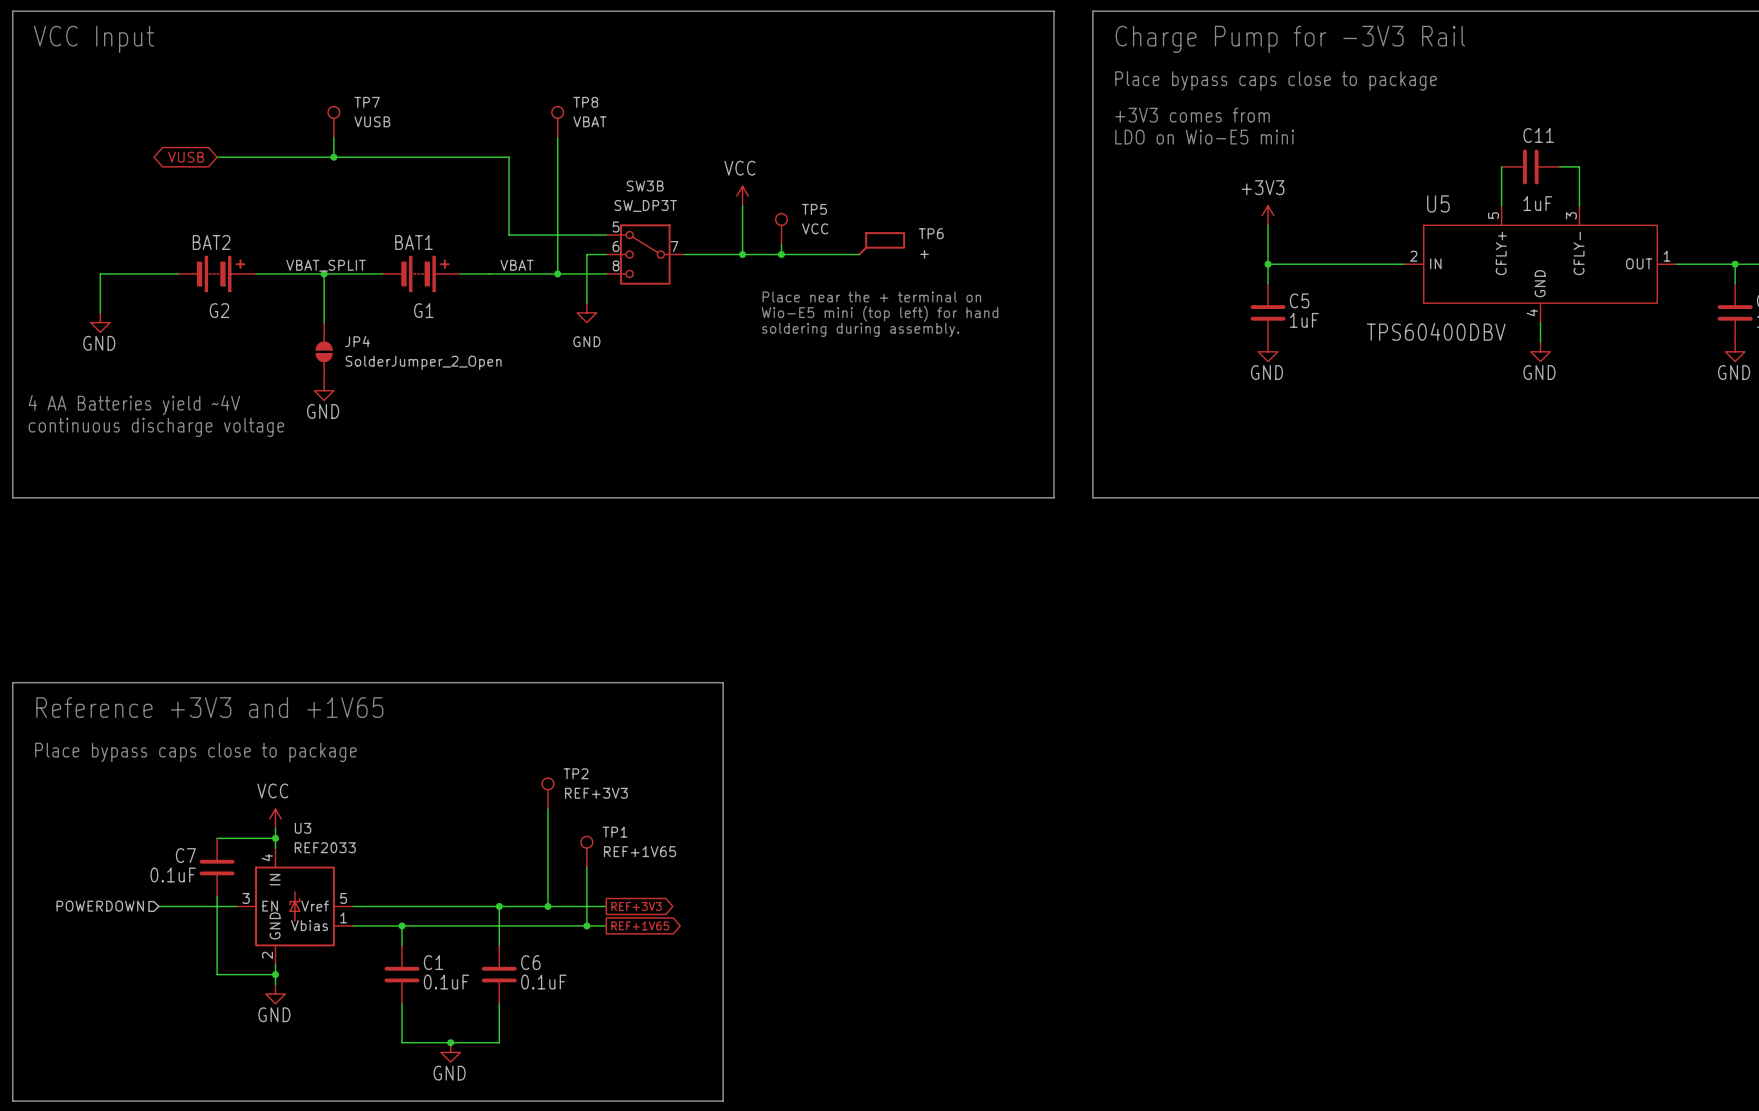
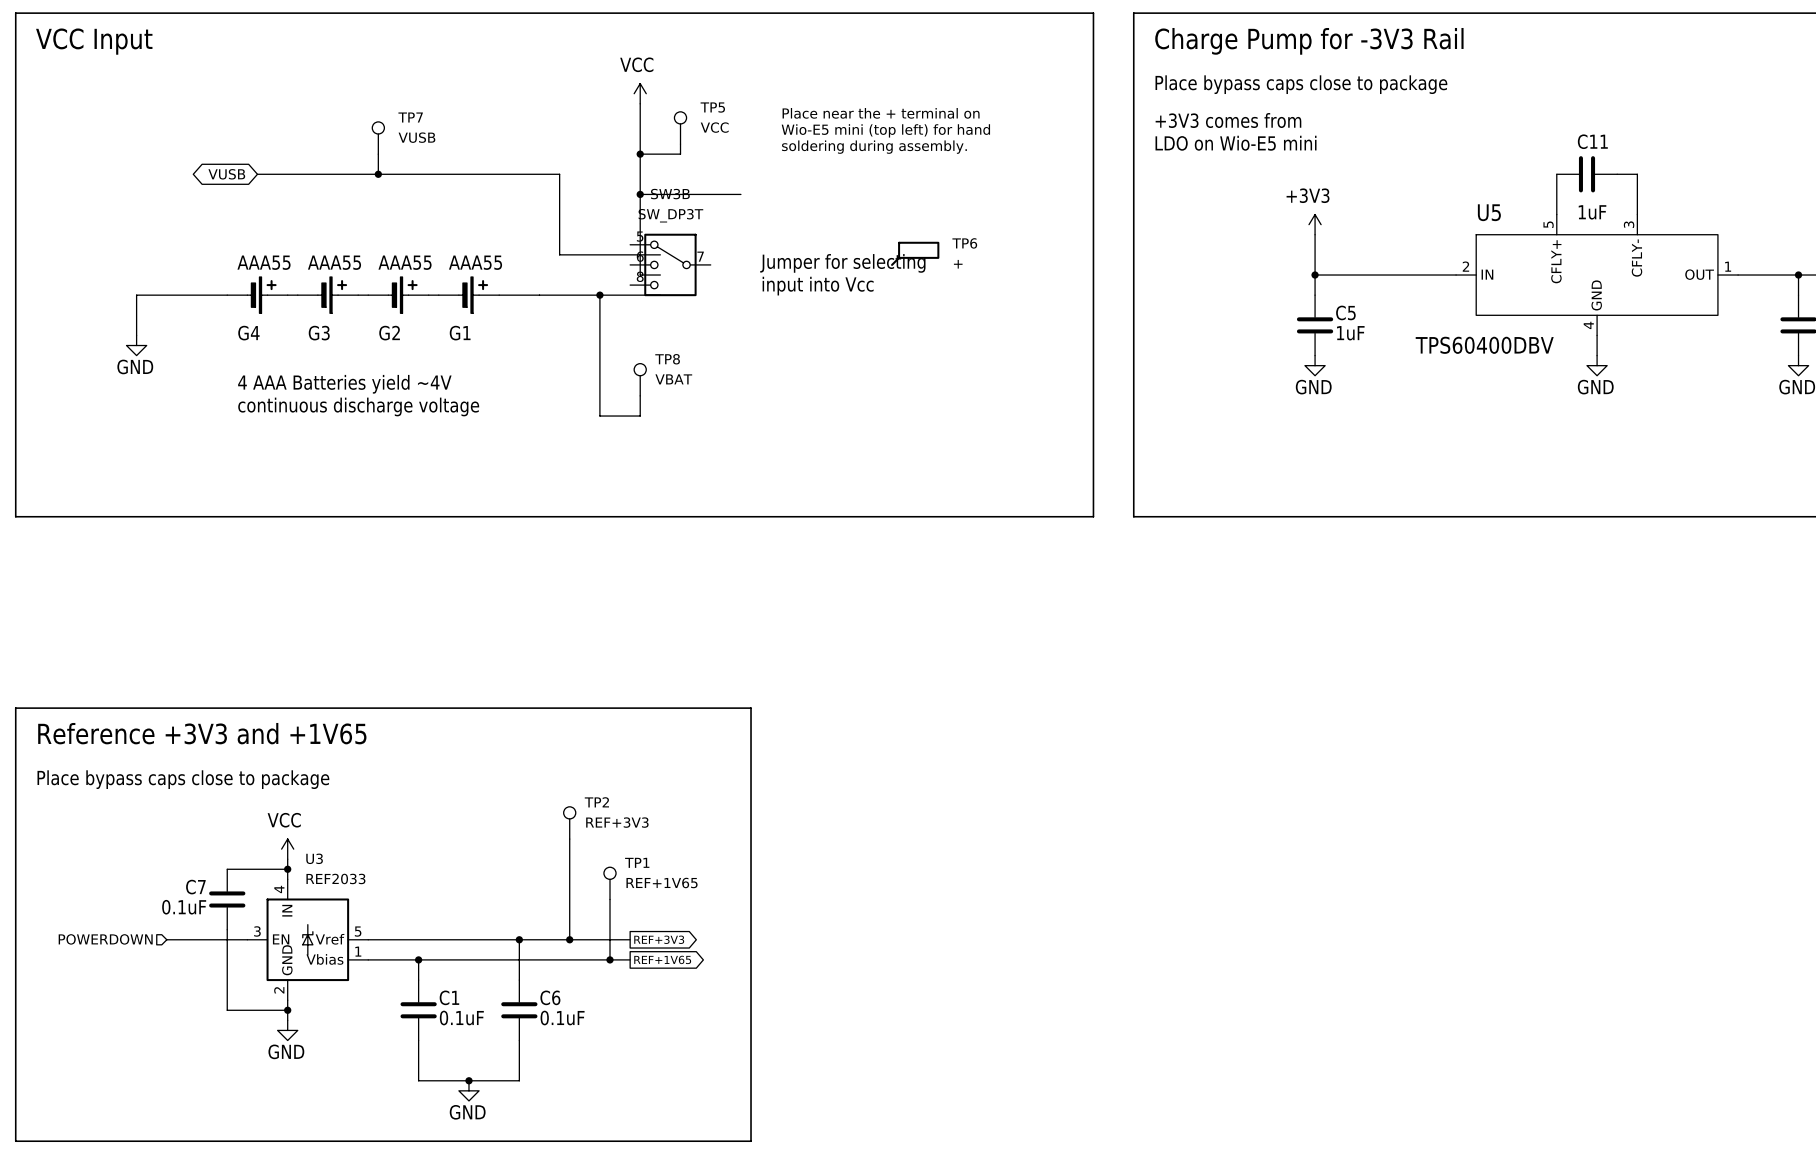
wire: none -> (640, 103) (640, 275) (660, 275)
TP7 position: (333, 122) -> (378, 138)
TP8 position: (557, 122) -> (640, 379)
wire: (333, 137) (333, 157) -> (378, 154) (378, 174)
wire: (557, 137) (557, 273) -> none
wire: none -> (680, 144) (680, 154) (640, 154)
junction: none -> (640, 154)
global label position: VUSB (186, 157) -> VUSB (226, 174)
wire: (217, 157) (509, 157) (509, 235) (606, 235) -> (257, 174) (559, 174) (559, 254) (660, 254)
junction position: (333, 157) -> (378, 174)
wire: none -> (640, 194) (740, 194)
junction: none -> (640, 194)
power symbol position: VCC (742, 196) -> VCC (640, 93)
wire: (742, 205) (742, 254) -> none
TP5 position: (781, 229) -> (680, 127)
G2 value: BAT2 (211, 242) -> AAA55 (405, 262)
G1 value: BAT1 (413, 242) -> AAA55 (475, 262)
text: none -> Jumper for selecting (842, 263)
wire: (606, 254) (586, 254) (586, 303) -> none
wire: (684, 254) (859, 254) -> none
junction: (742, 254) -> none
junction: (781, 254) -> none
G2 symbol: [178, 256, 257, 292] -> [368, 277, 429, 314]
G1 symbol: [382, 256, 461, 292] -> [438, 277, 500, 314]
label: VBAT_SPLIT (326, 265) -> none
label: VBAT (516, 265) -> none
wire: (178, 273) (100, 273) (100, 312) -> none
wire: (256, 273) (382, 273) -> none
wire: (324, 273) (324, 322) -> none
junction: (324, 273) -> none
wire: (460, 273) (606, 273) -> none
junction position: (557, 273) -> (599, 295)
text: none -> input into Vcc (818, 286)
wire: none -> (227, 295) (136, 295) (136, 335)
G4: none -> AAA55 (257, 295)
wire: none -> (287, 295) (297, 295)
G3: none -> AAA55 (327, 295)
wire: none -> (358, 295) (368, 295)
wire: none -> (428, 295) (438, 295)
wire: none -> (499, 295) (660, 295)
wire: none -> (599, 295) (599, 416) (640, 416) (640, 395)
text position: Place near the + terminal on (871, 296) -> Place near the + terminal on (881, 113)
power symbol: GND (586, 312) -> none
text position: Wio-E5 mini (top left) for hand (879, 313) -> Wio-E5 mini (top left) for hand (885, 130)
power symbol position: GND (100, 322) -> GND (136, 345)
text position: soldering during assembly. (860, 329) -> soldering during assembly. (874, 147)
JP4: SolderJumper_2_Open (324, 351) -> none
text: none -> 4 AAA Batteries yield ~4V (344, 384)
power symbol: GND (324, 390) -> none
text: none -> continuous discharge voltage (358, 406)
text: 4 AA Batteries yield ~4V (134, 405) -> none
text: continuous discharge voltage (156, 427) -> none

